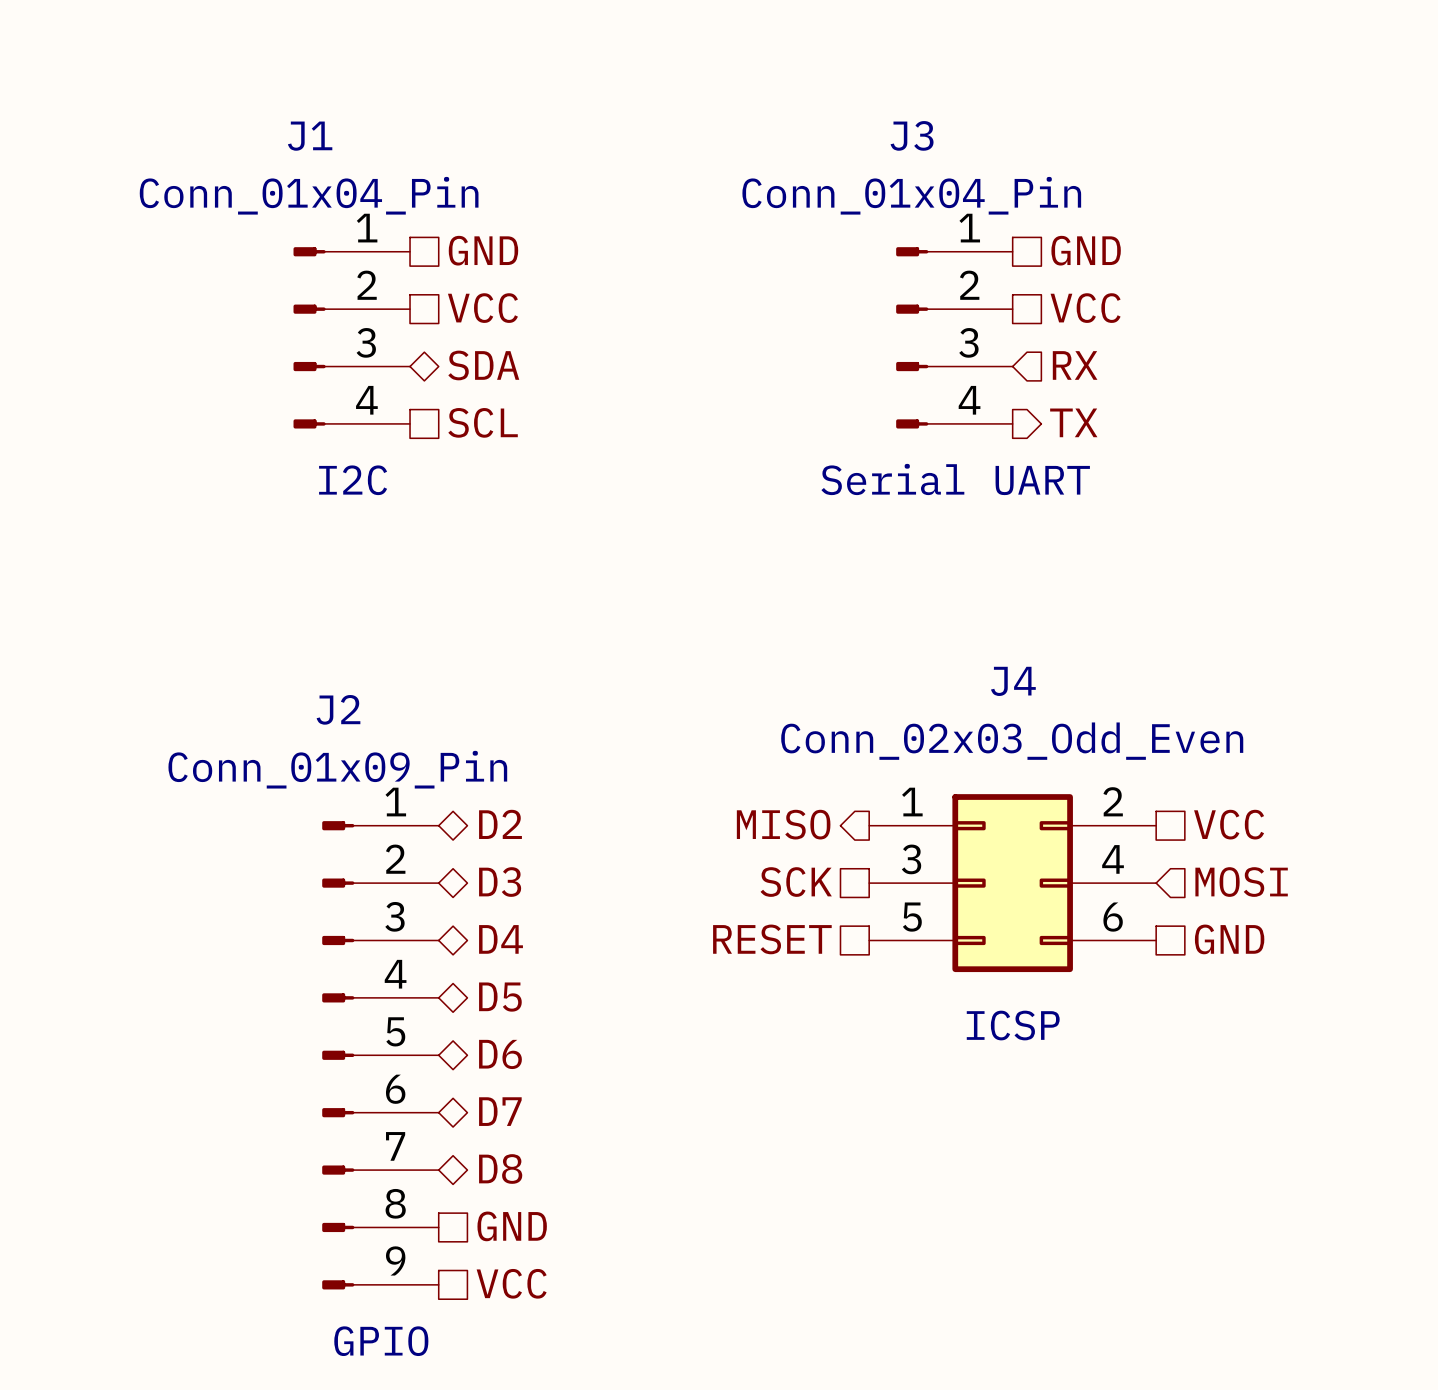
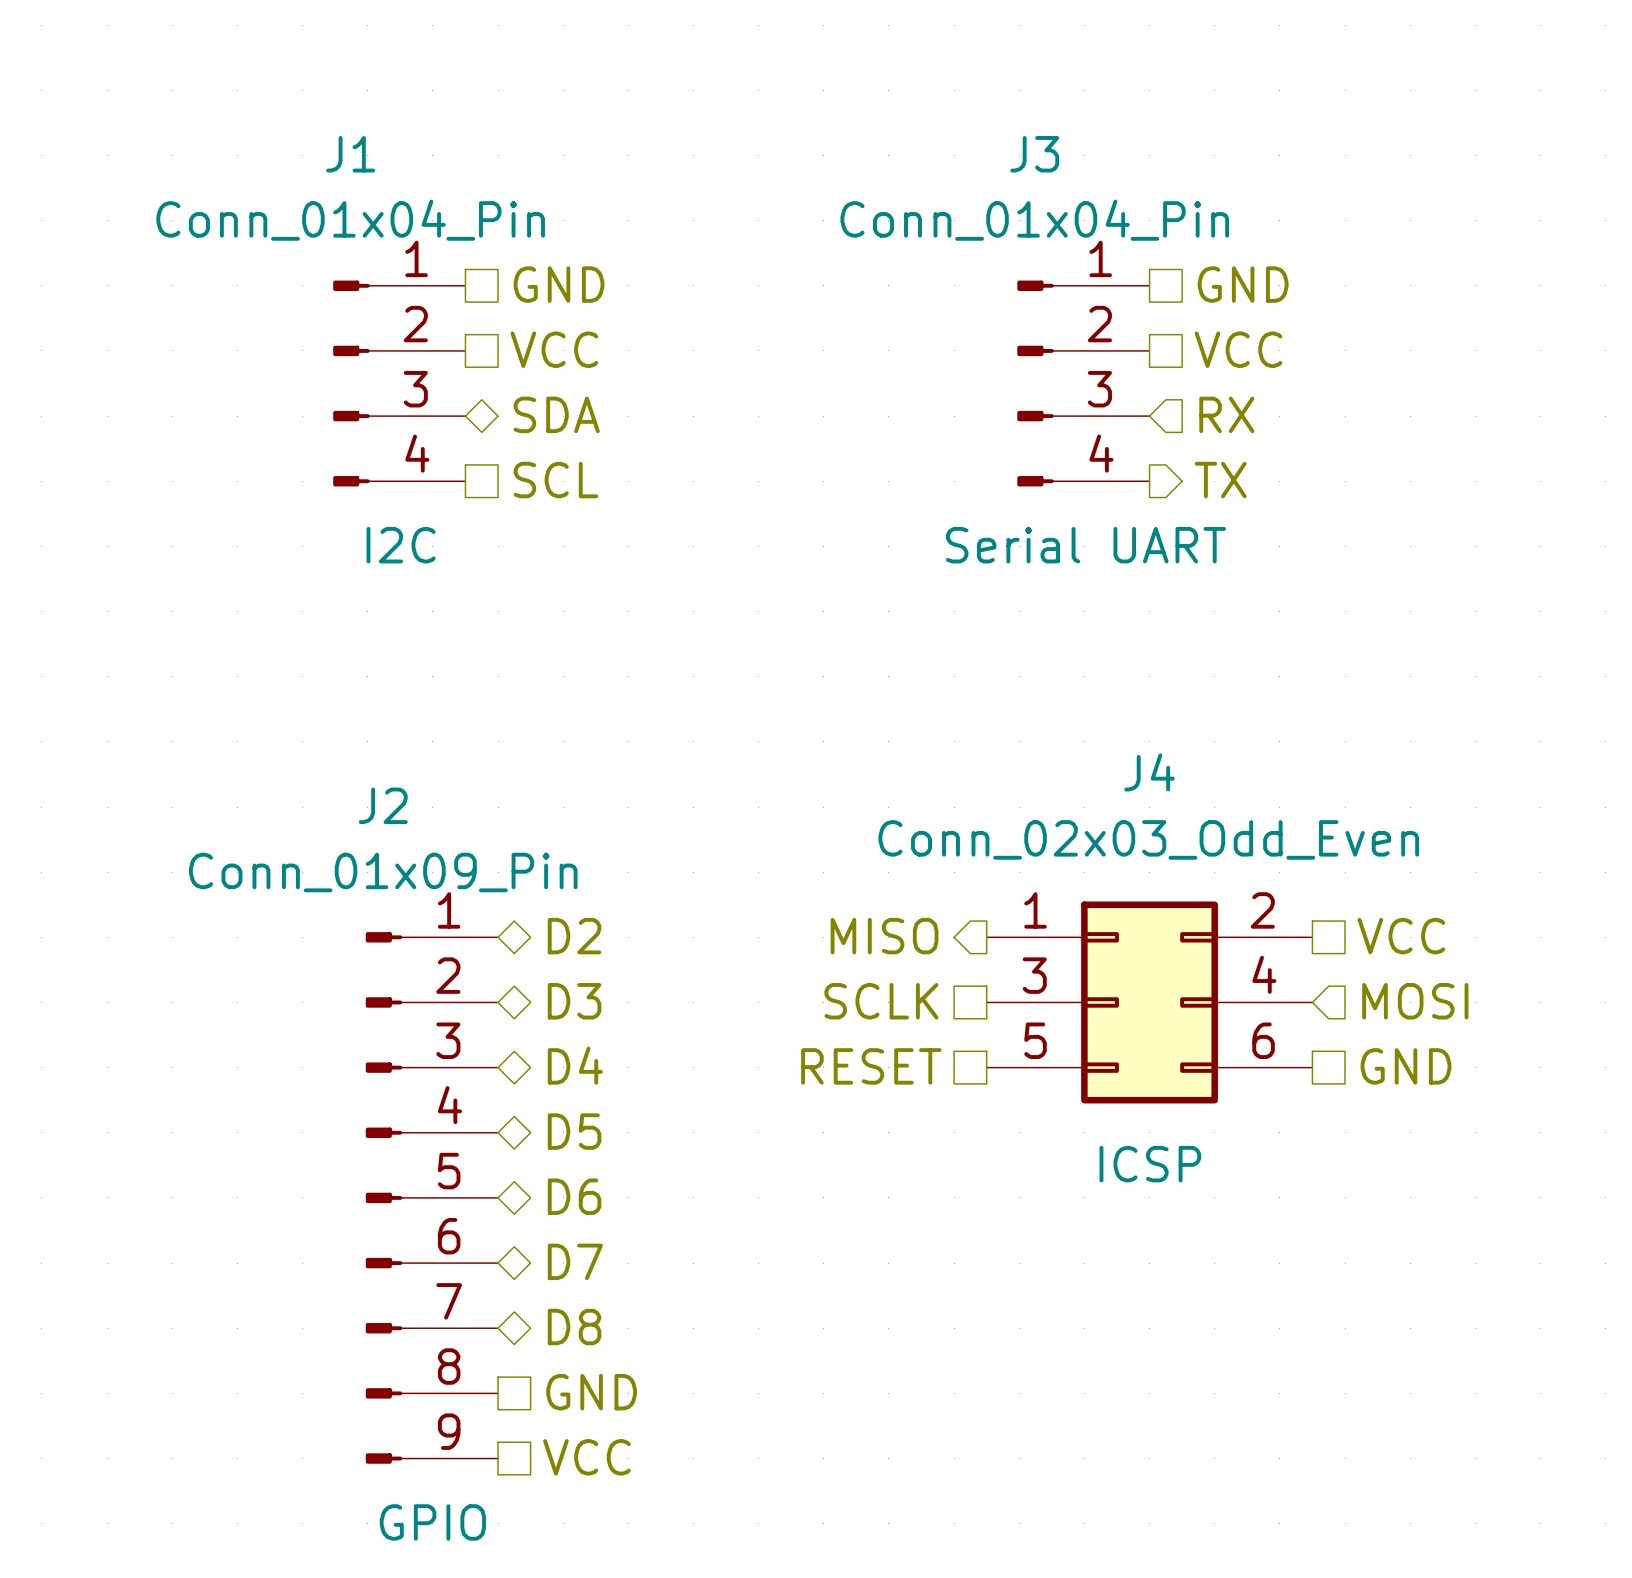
hierarchical label: SCK (796, 882) -> SCLK (881, 1001)

